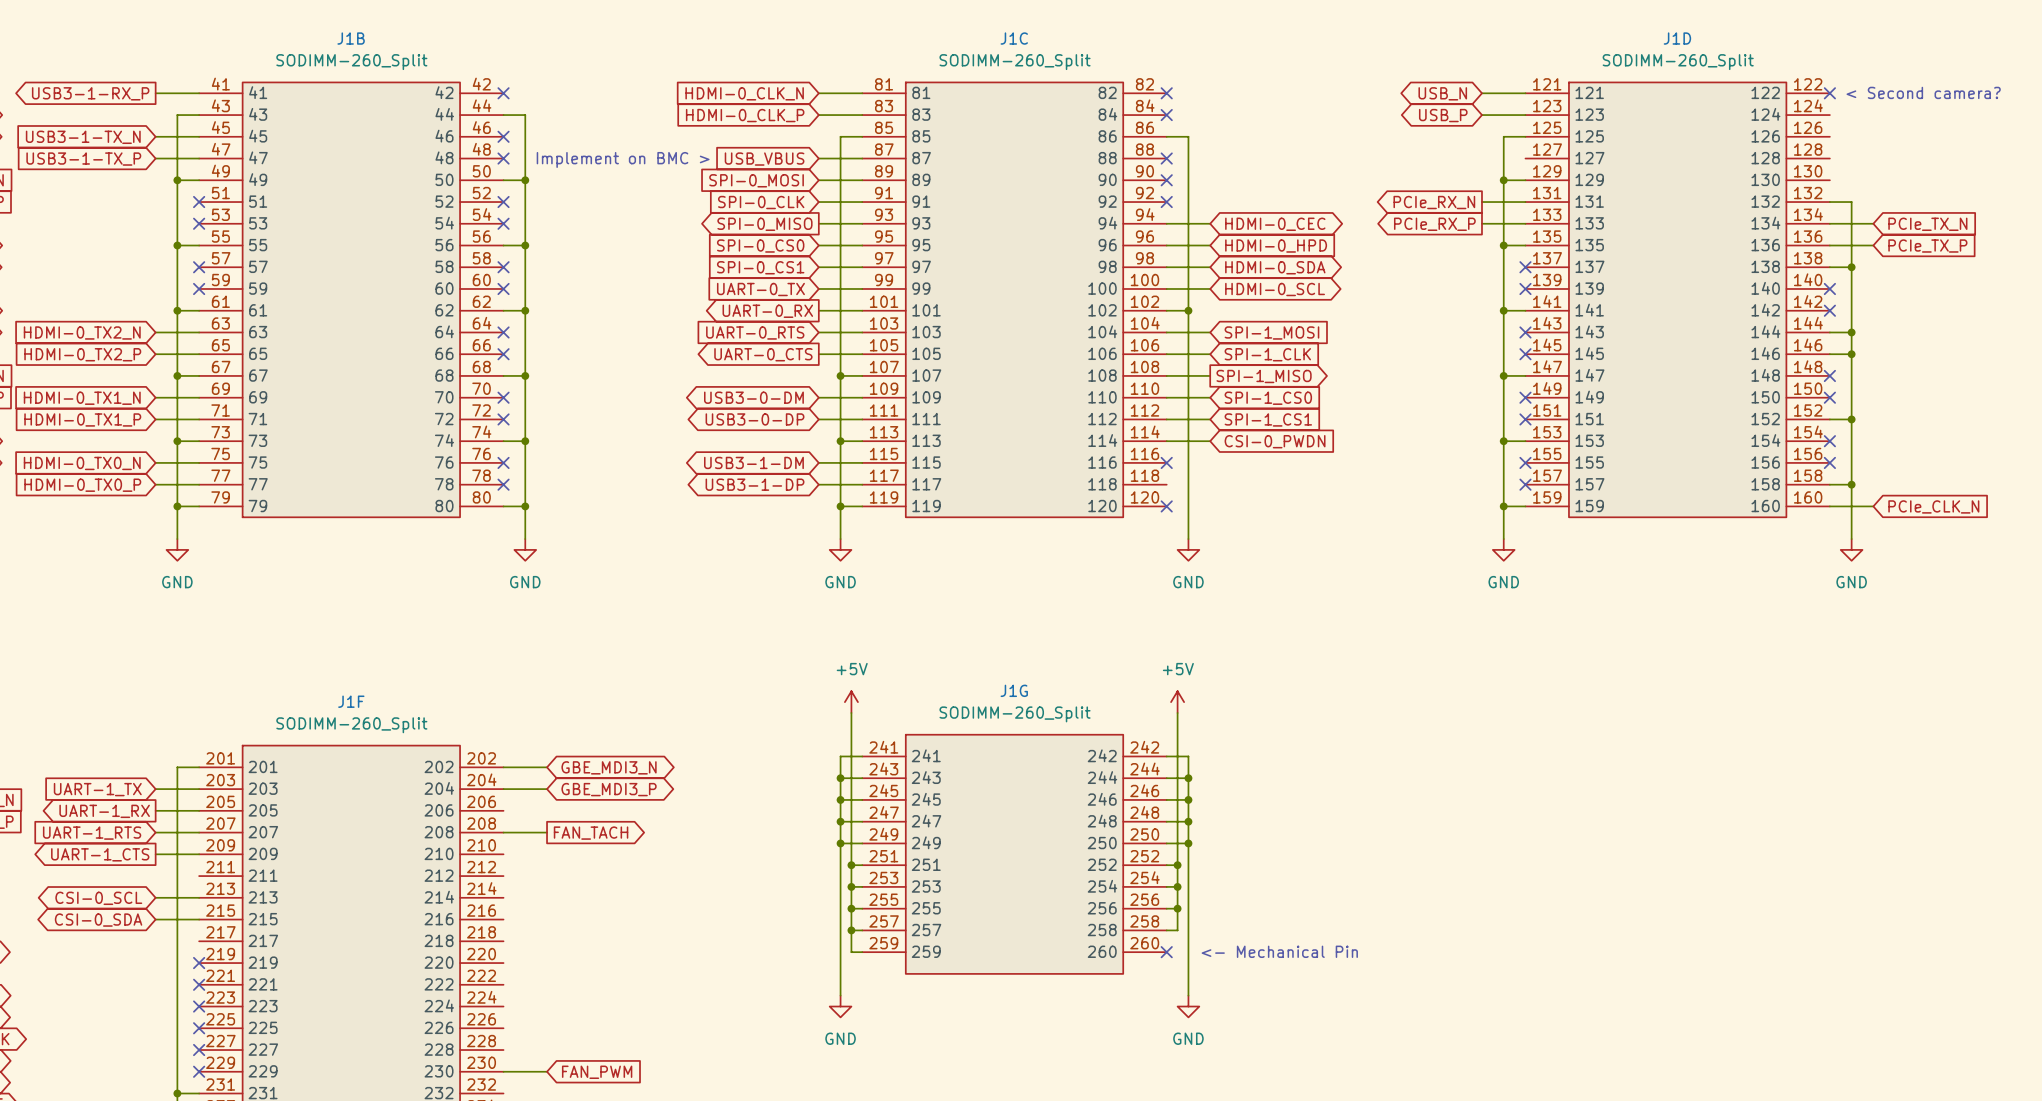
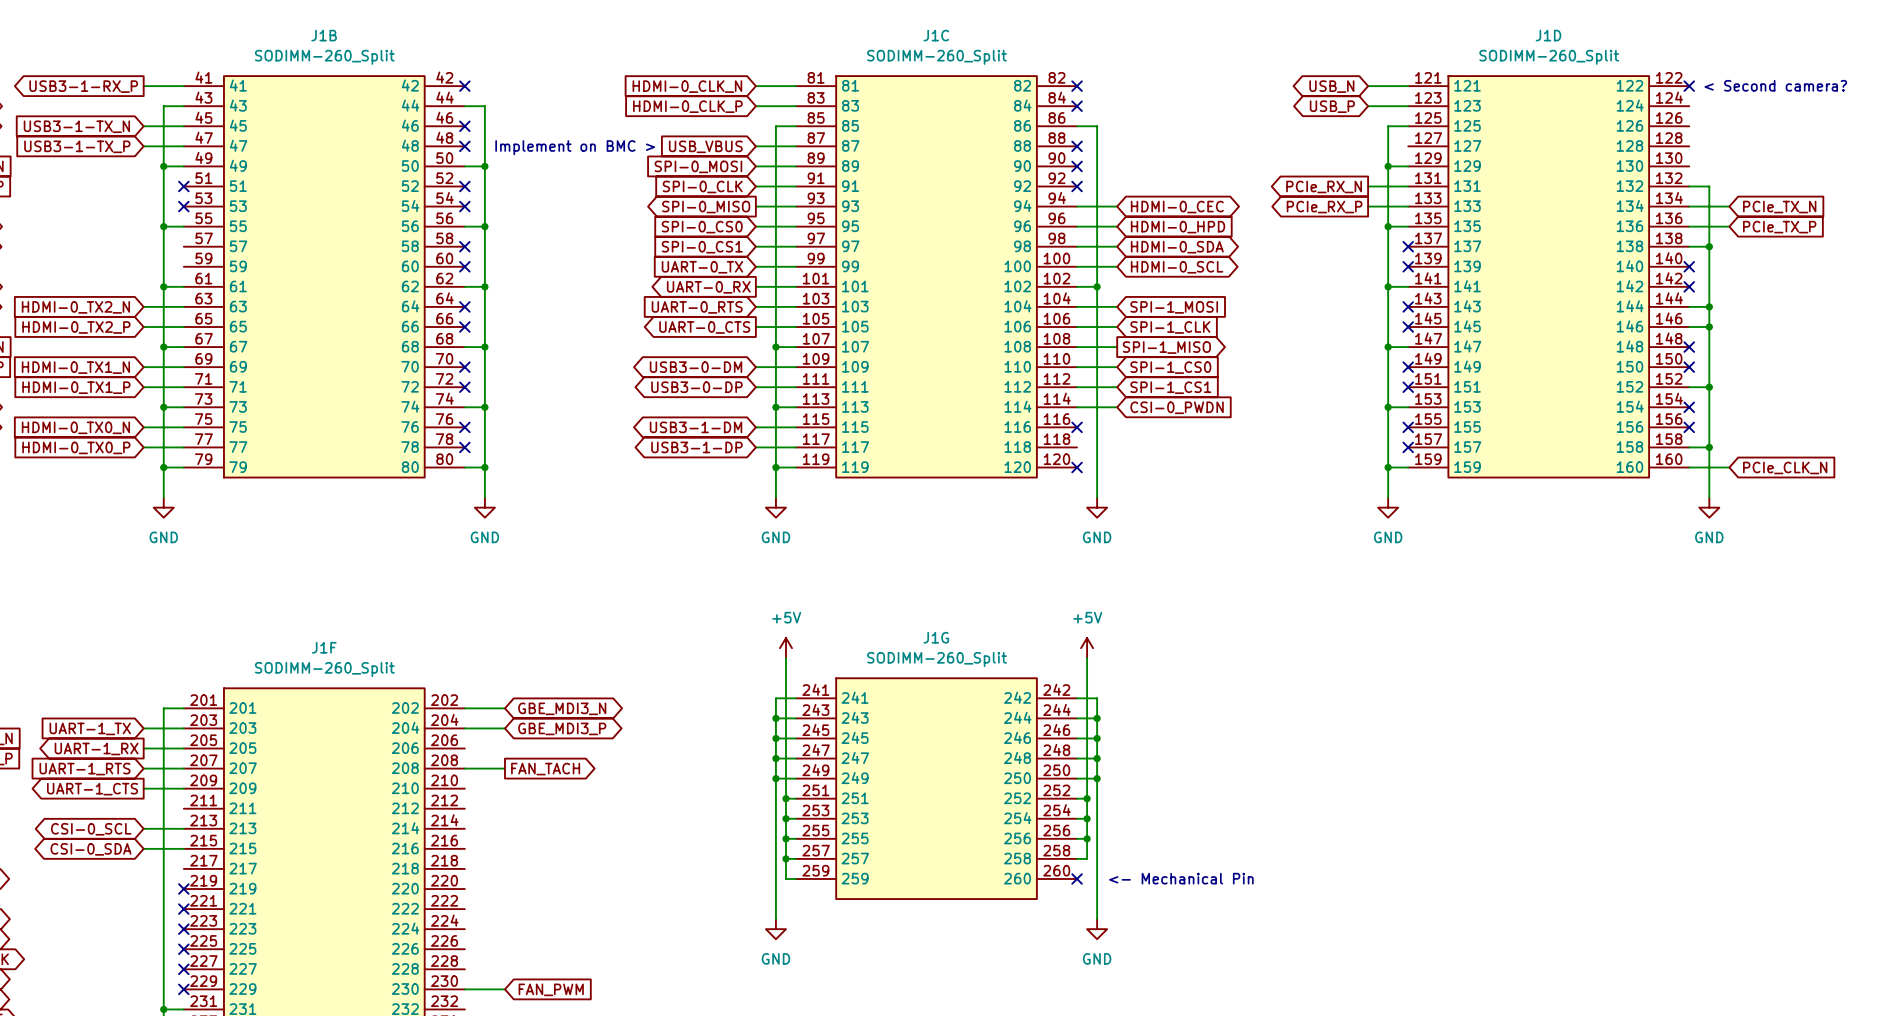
no-connect mark: (199, 267) -> none
no-connect mark: (199, 288) -> none

